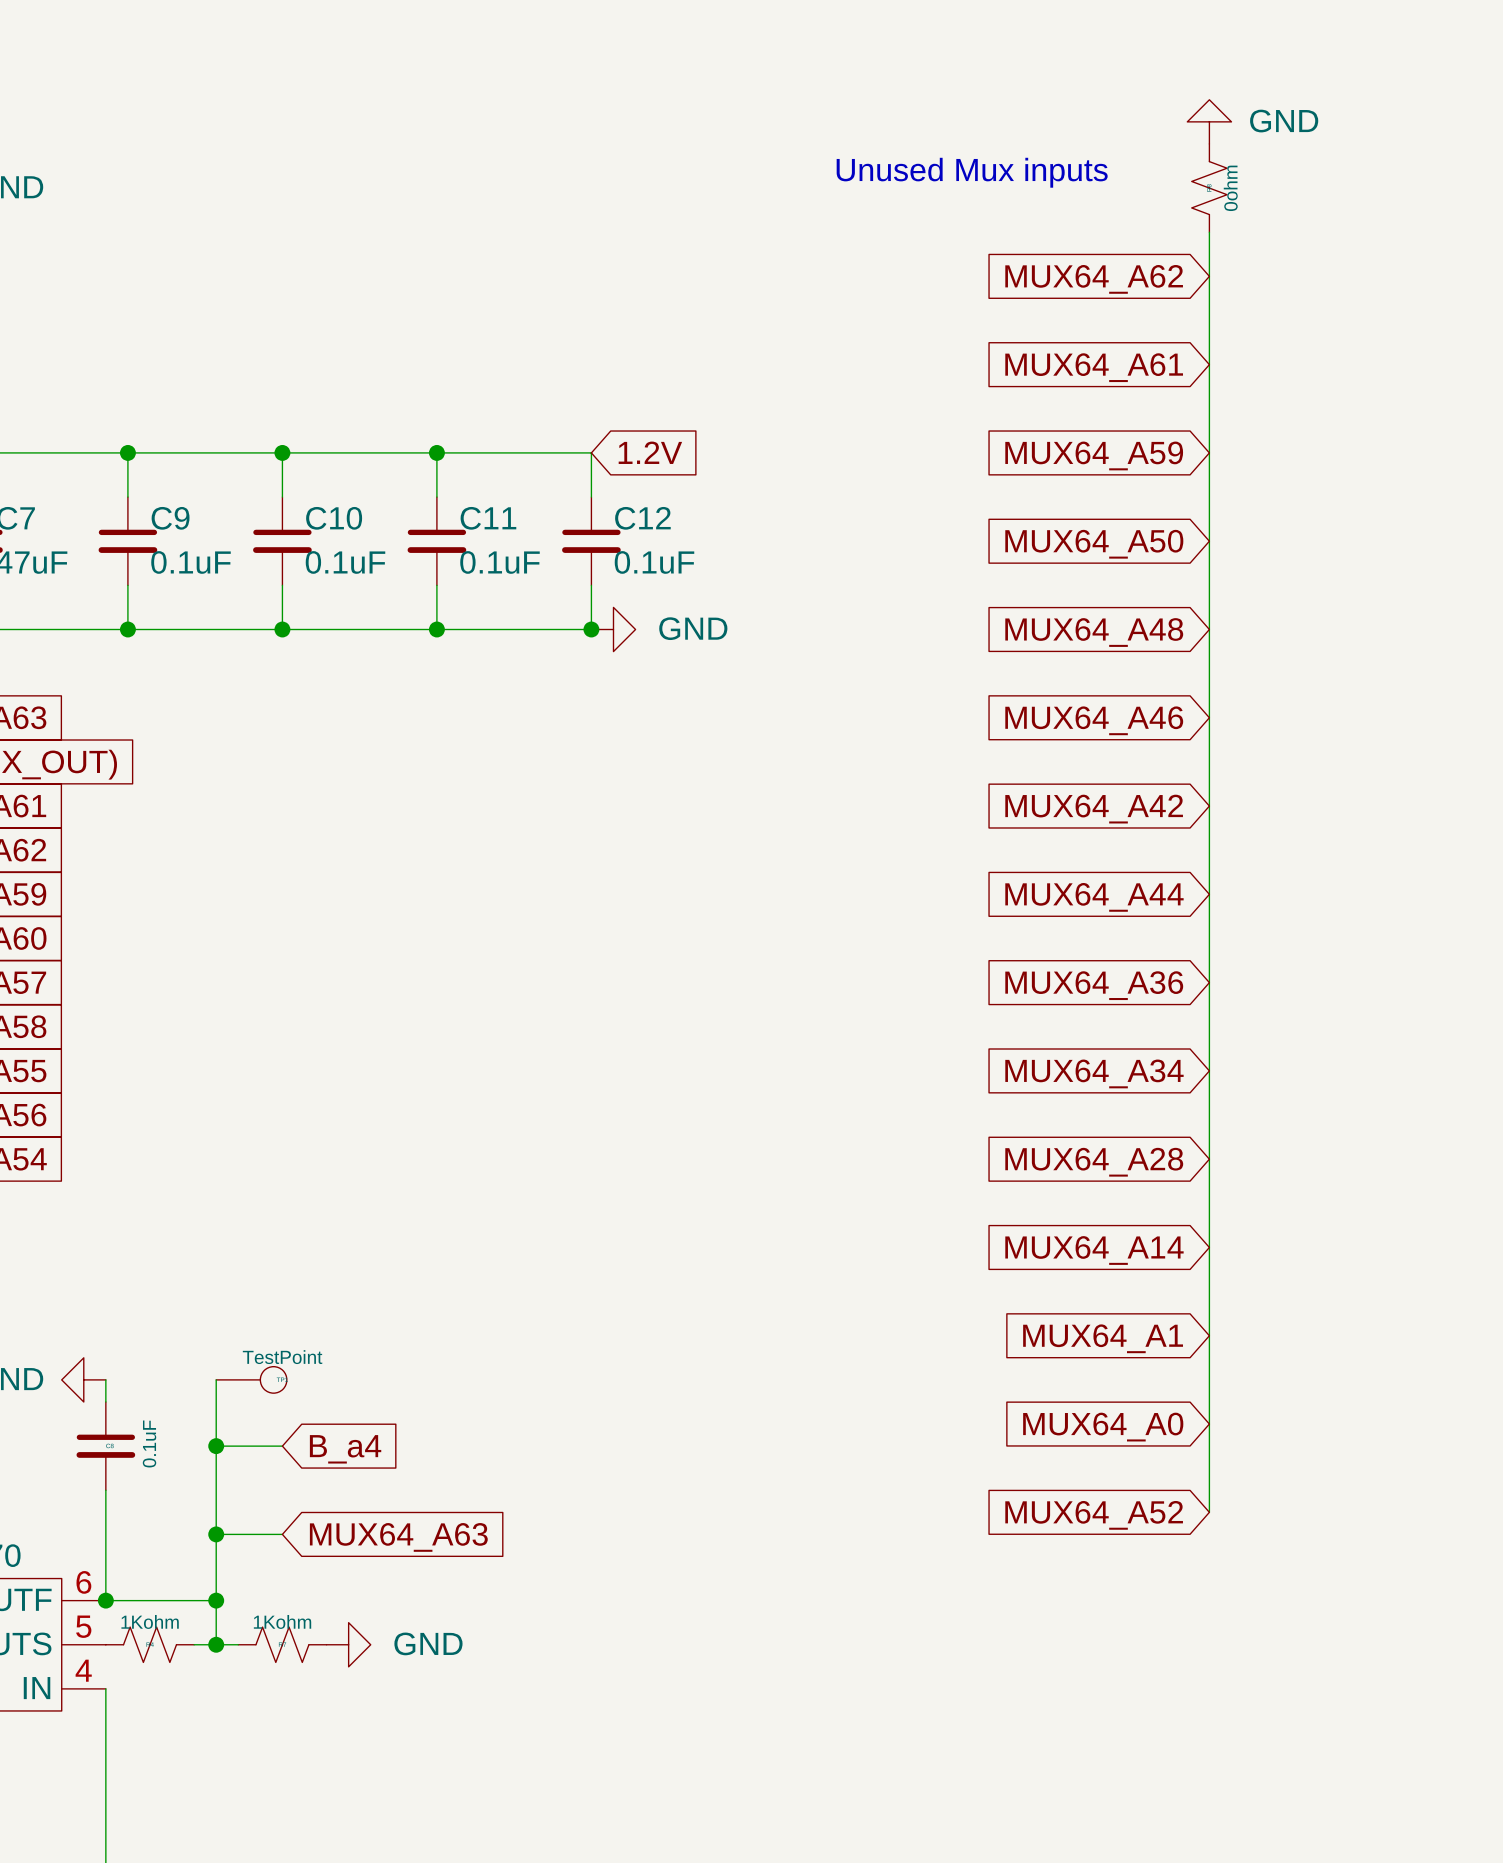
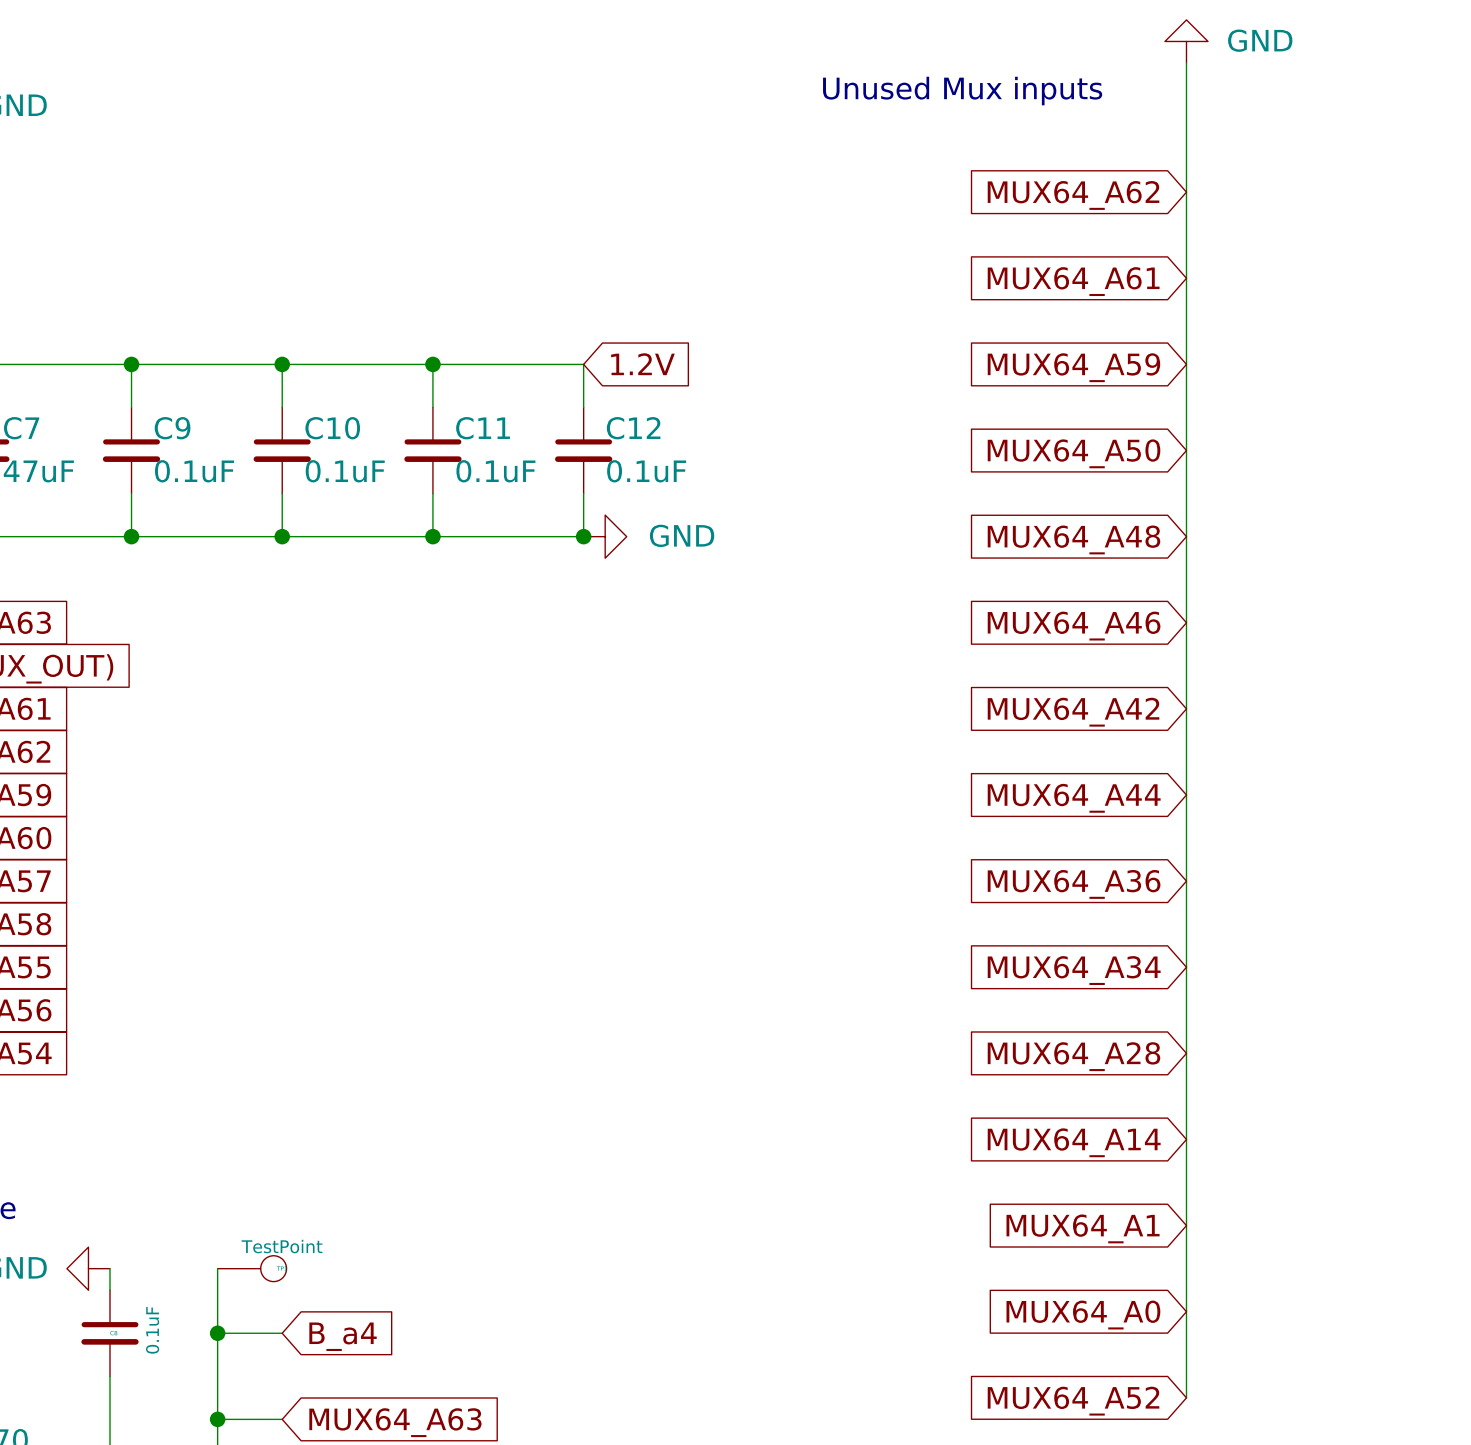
wire: none -> (1186, 62) (1186, 149)
part: 0ohm (1209, 188) -> none

